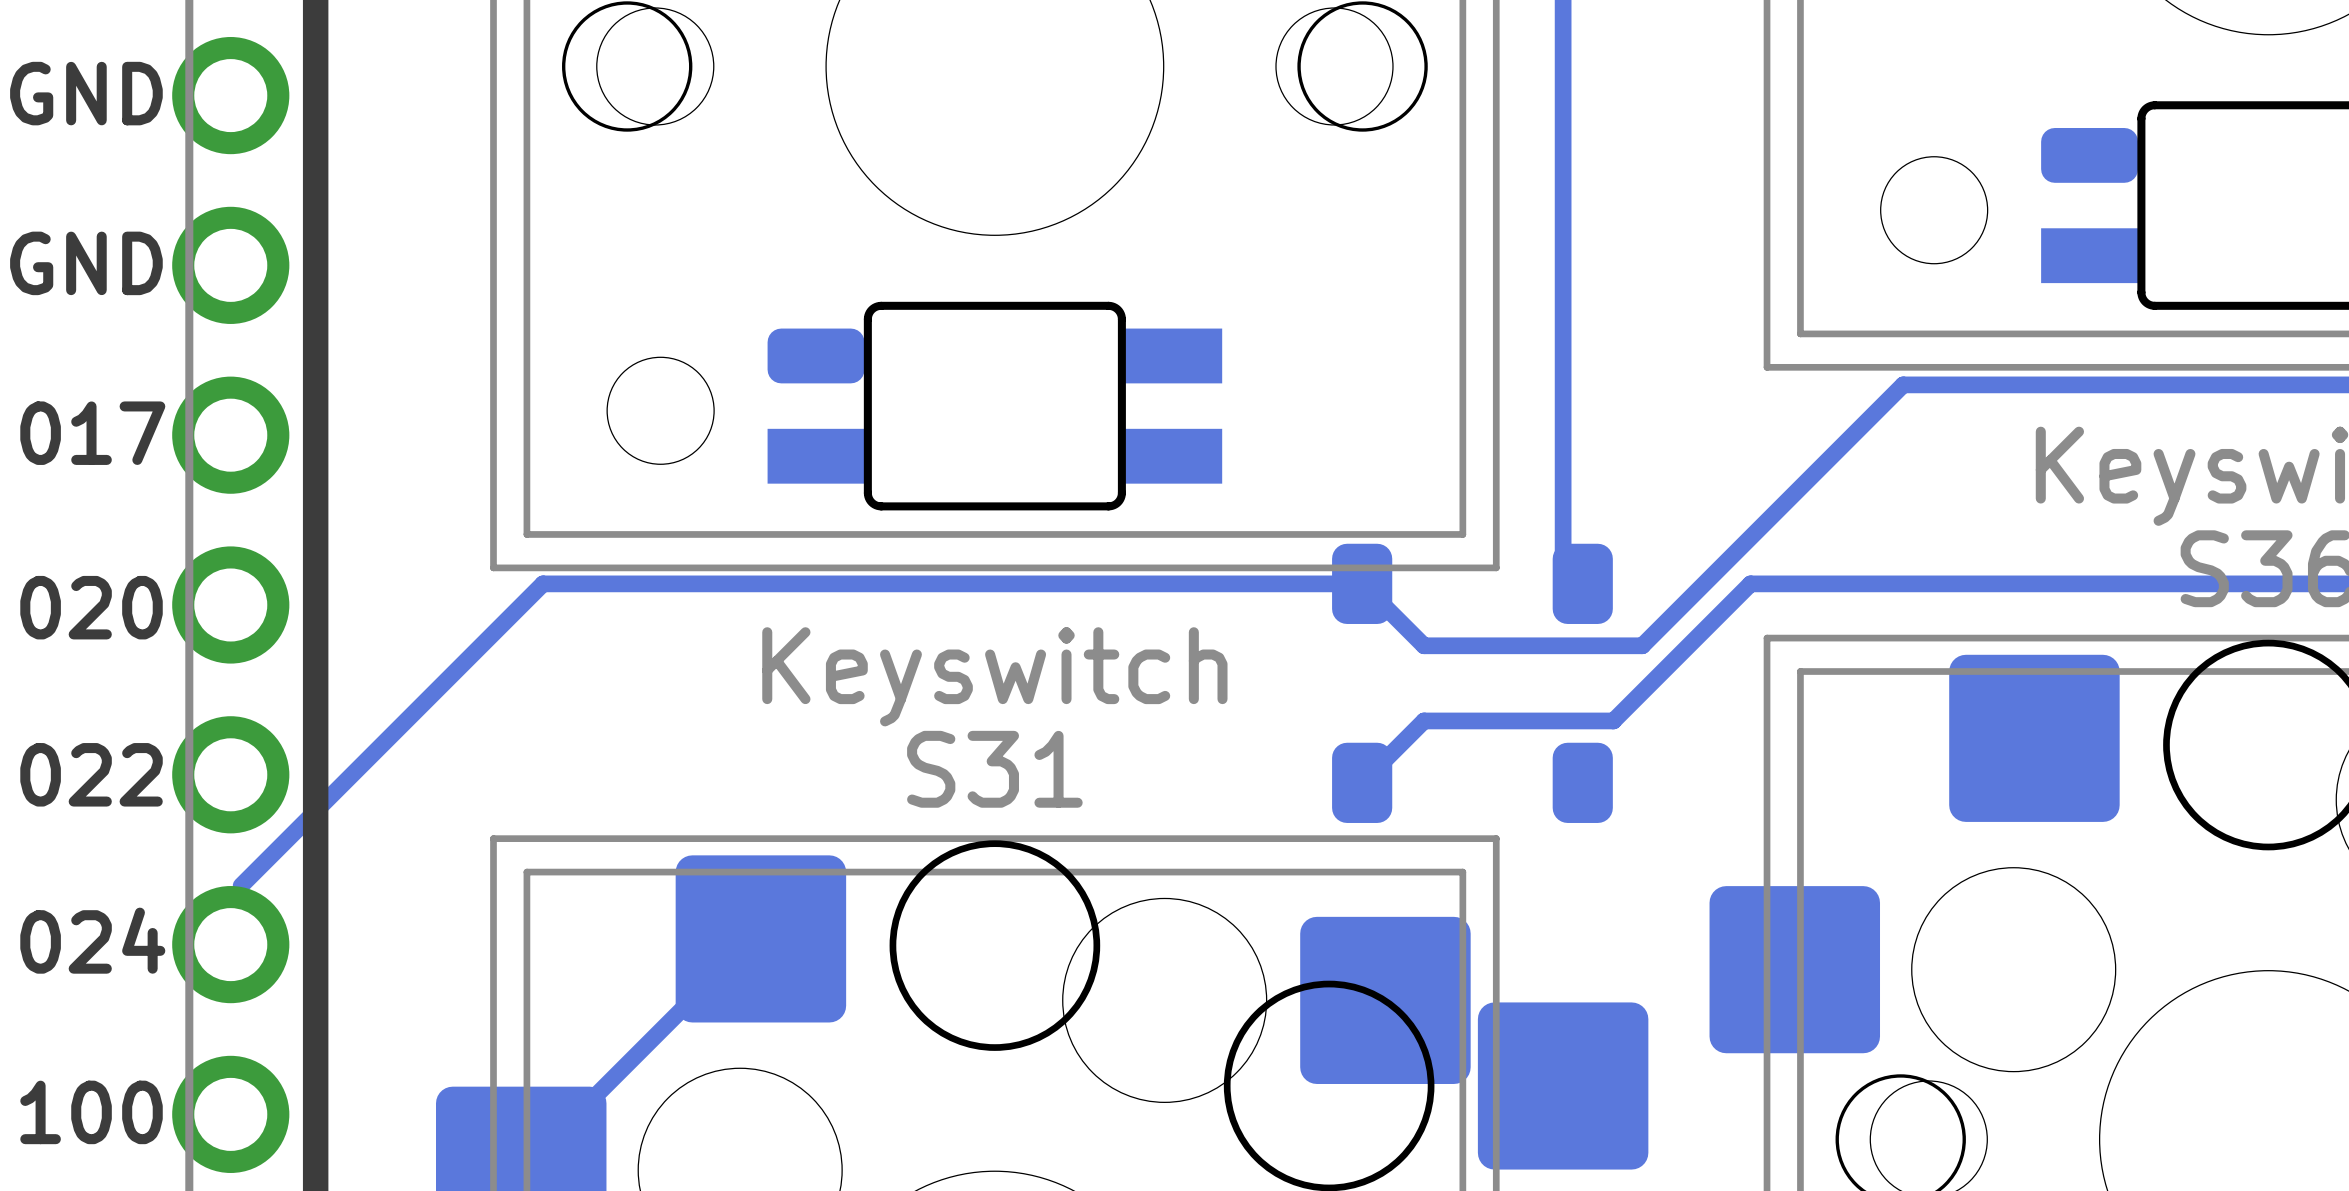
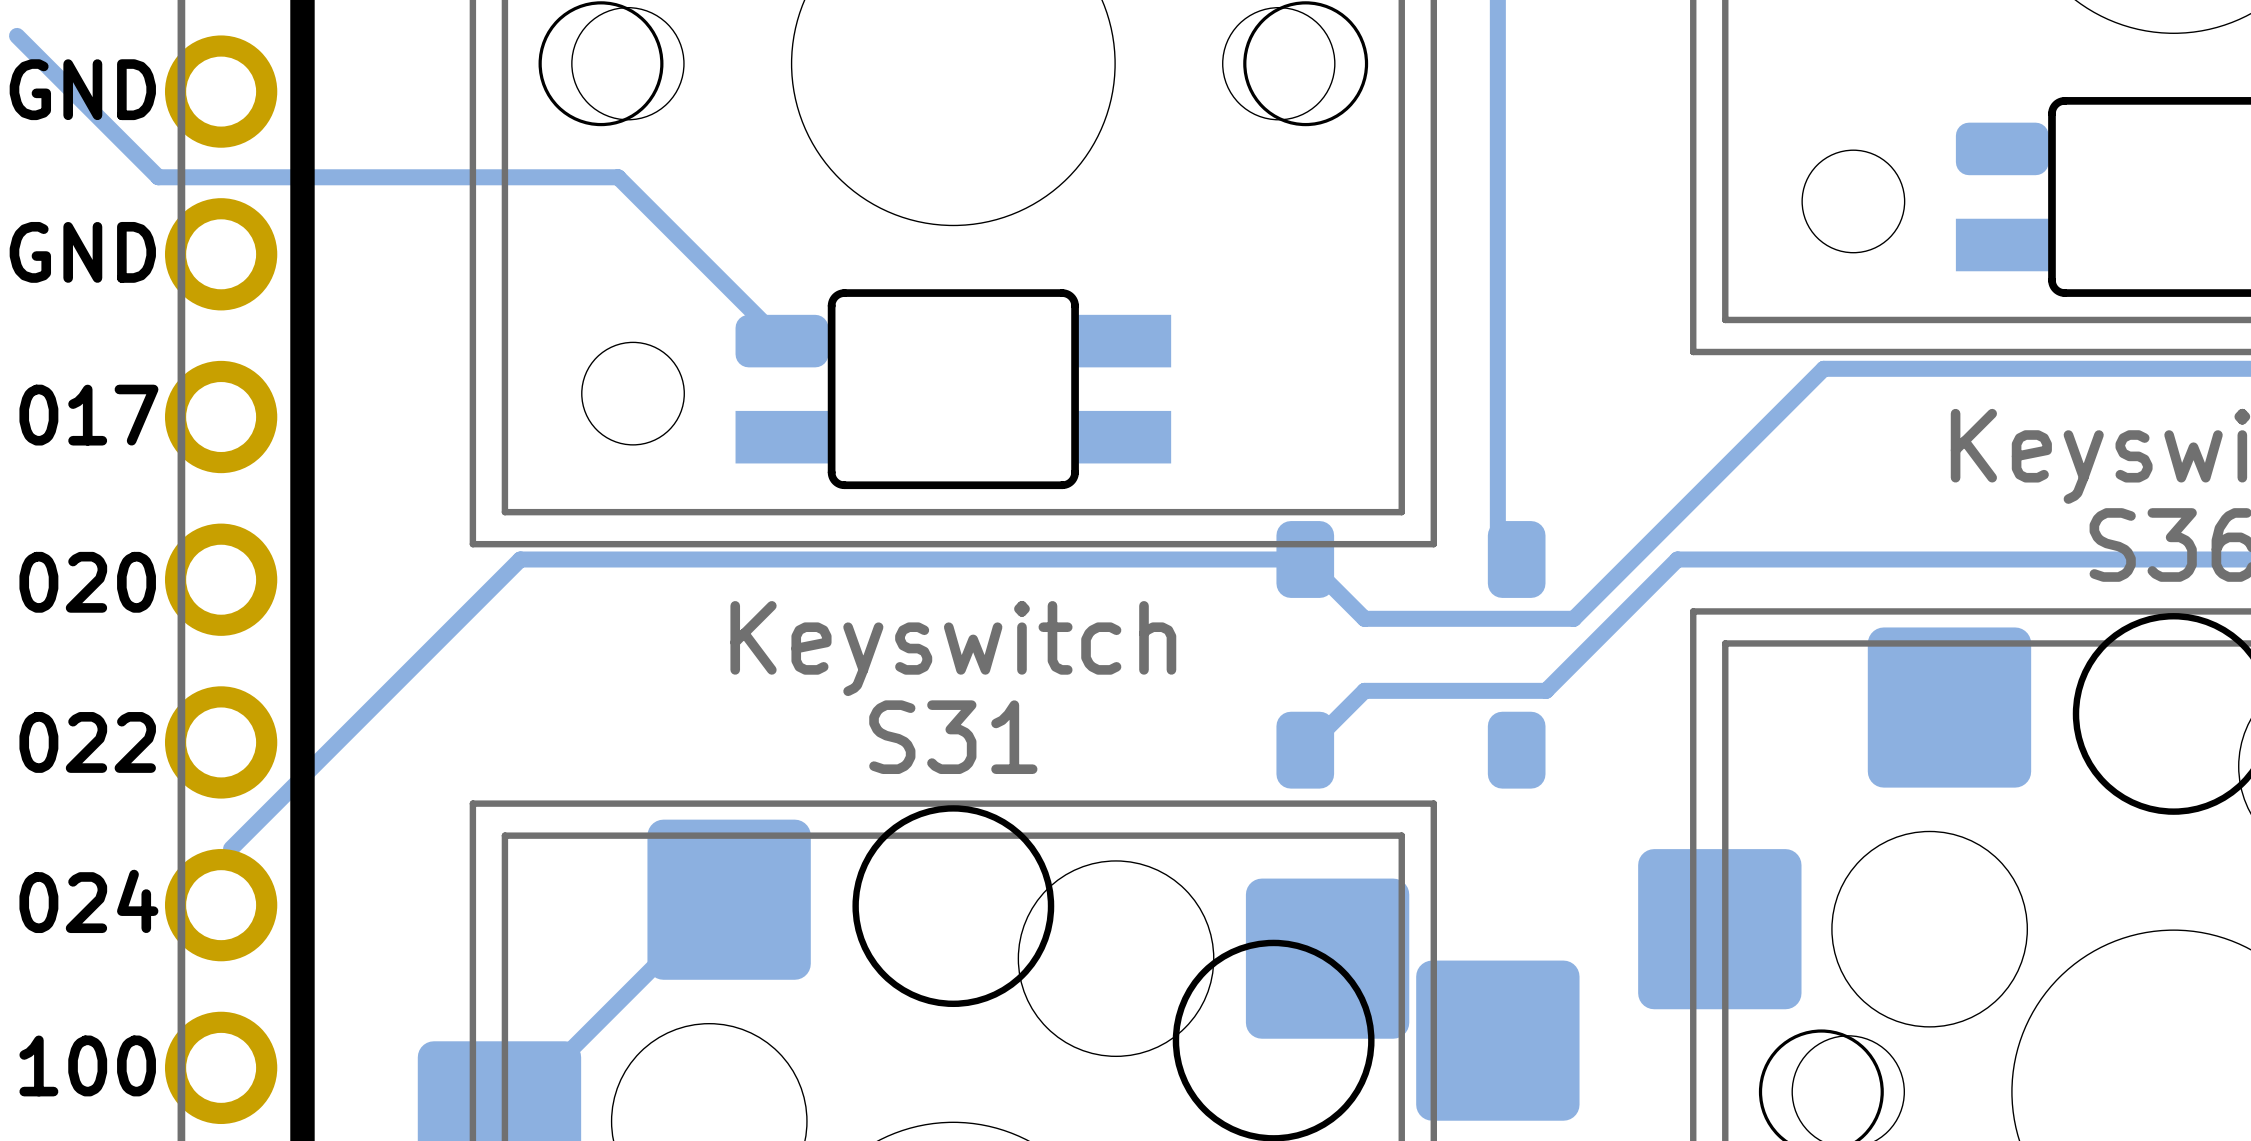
bottom track: none -> (17, 35) (158, 177) (618, 177) (781, 341)

